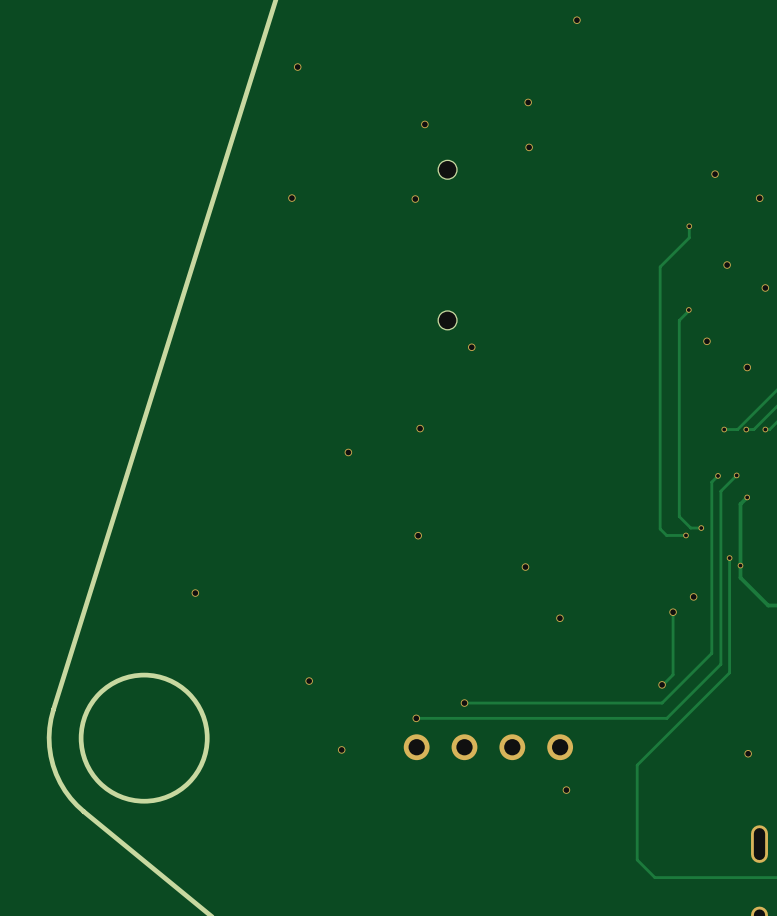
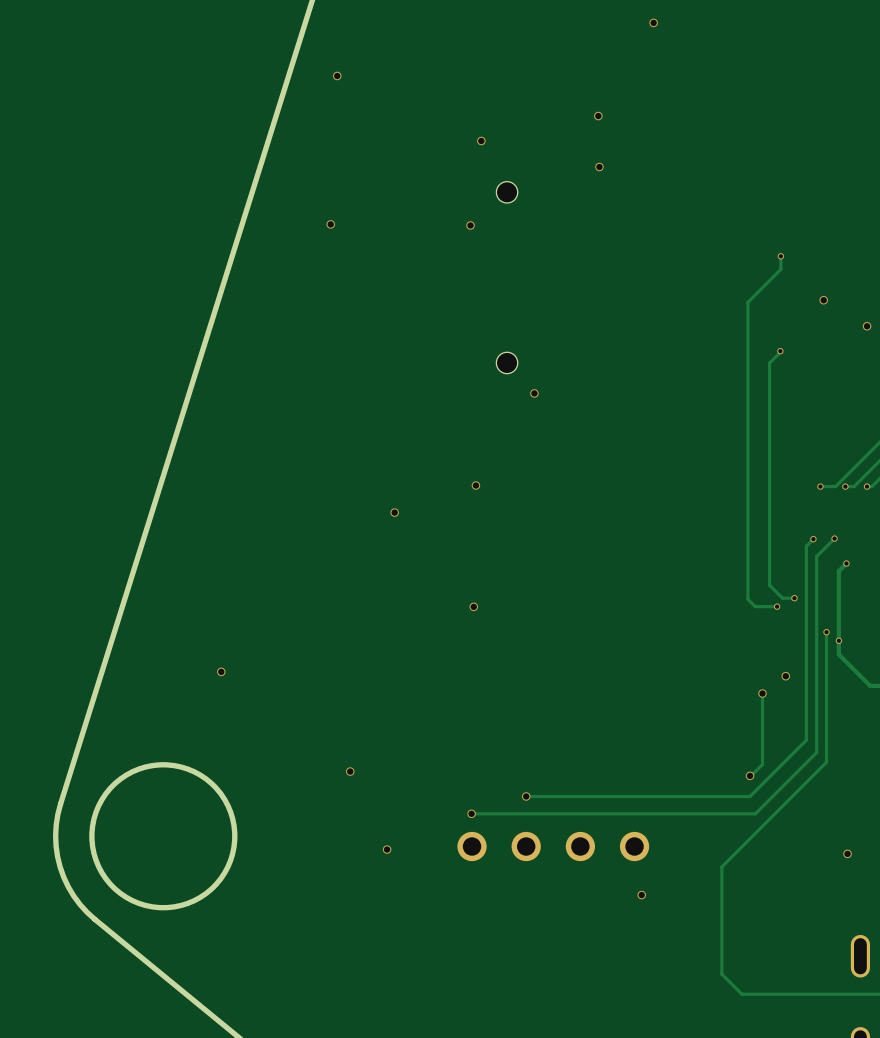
via: (715, 174) -> none
via: (759, 198) -> none
via: (706, 341) -> none
via: (747, 367) -> none
via: (525, 567) -> none
via: (559, 618) -> none

